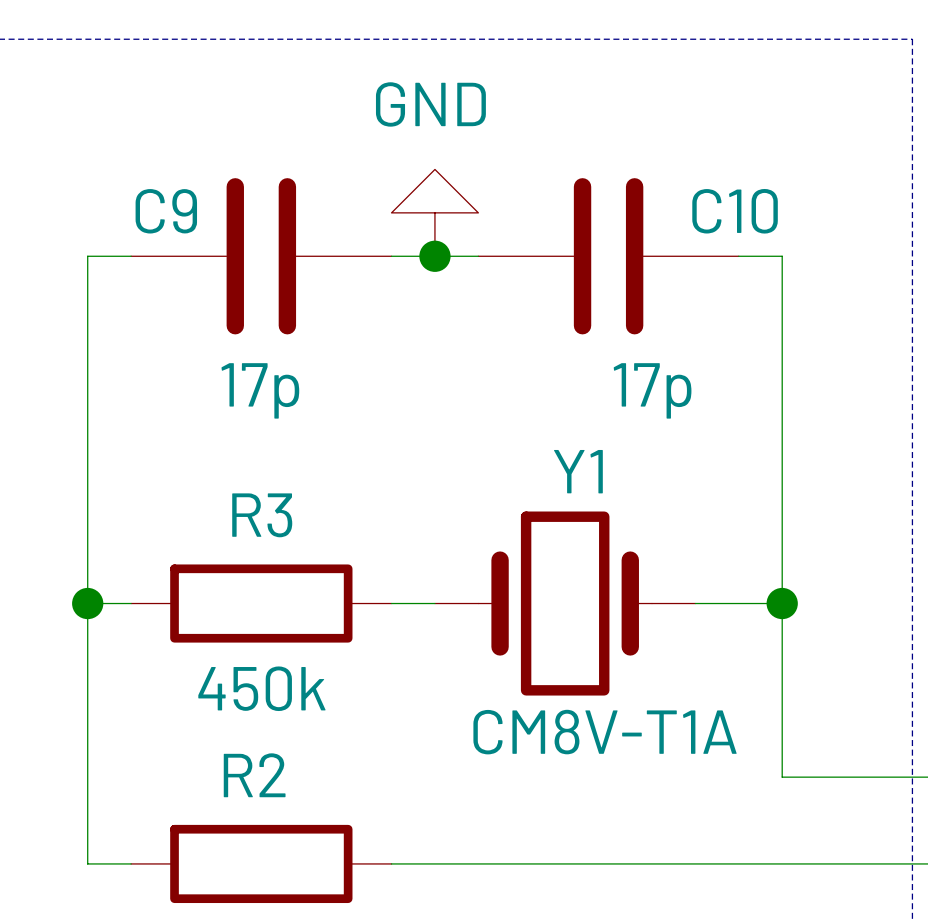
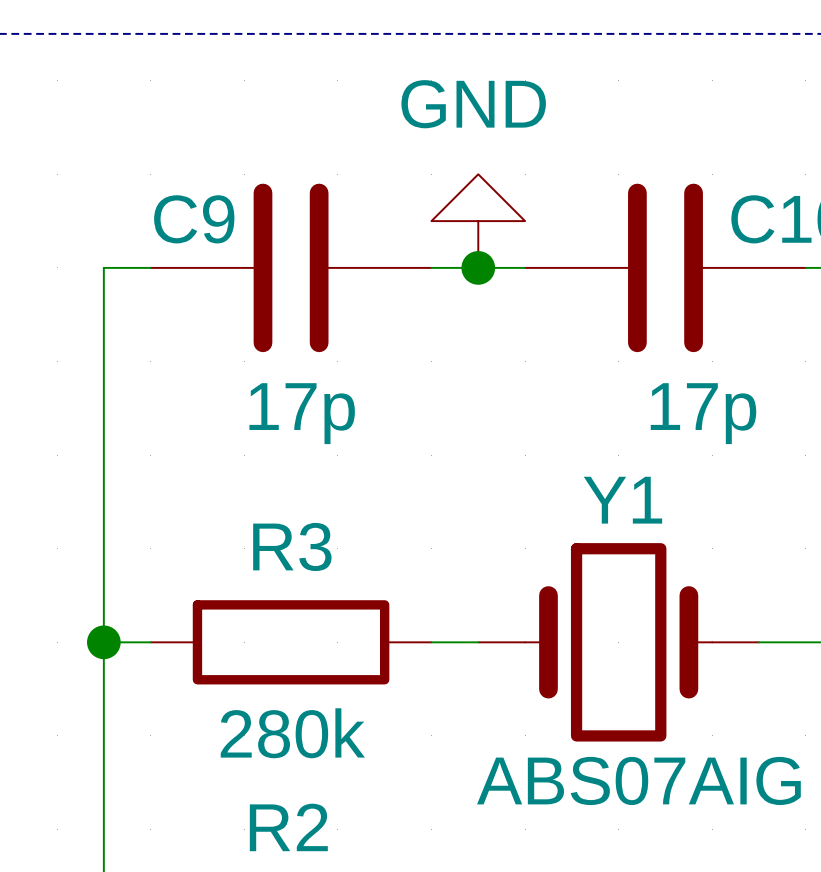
R3 value: 450k (261, 688) -> 280k (292, 733)
Y1 value: CM8V-T1A (605, 732) -> ABS07AIG (638, 780)

